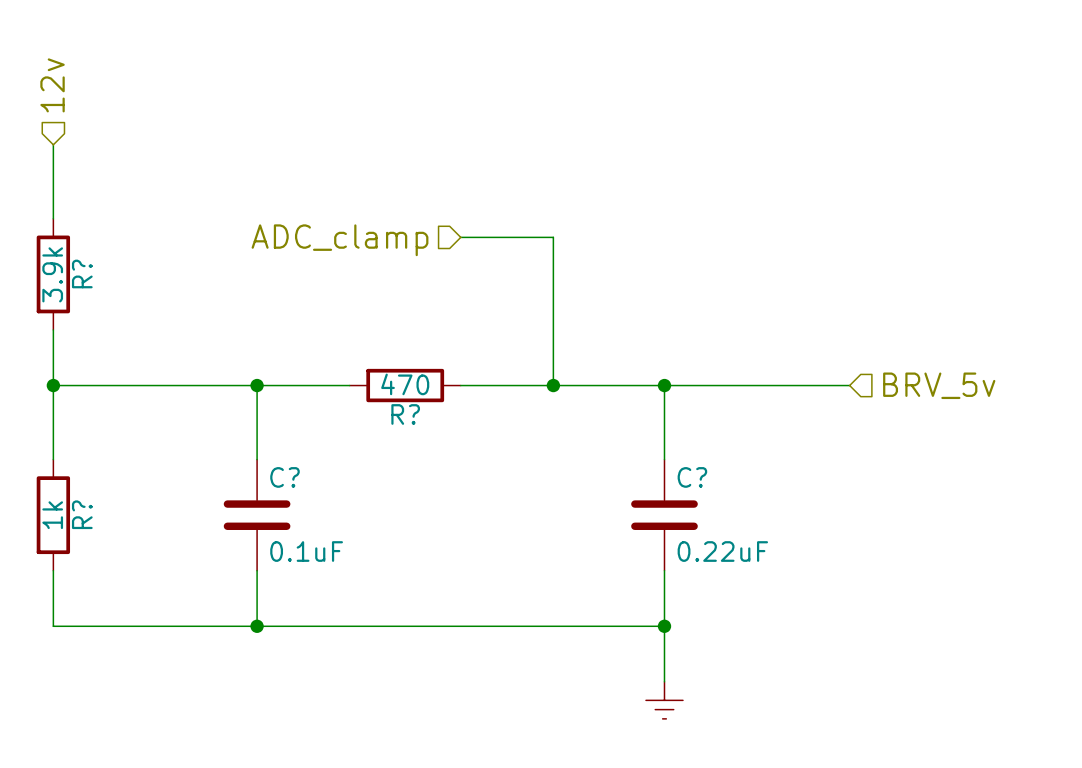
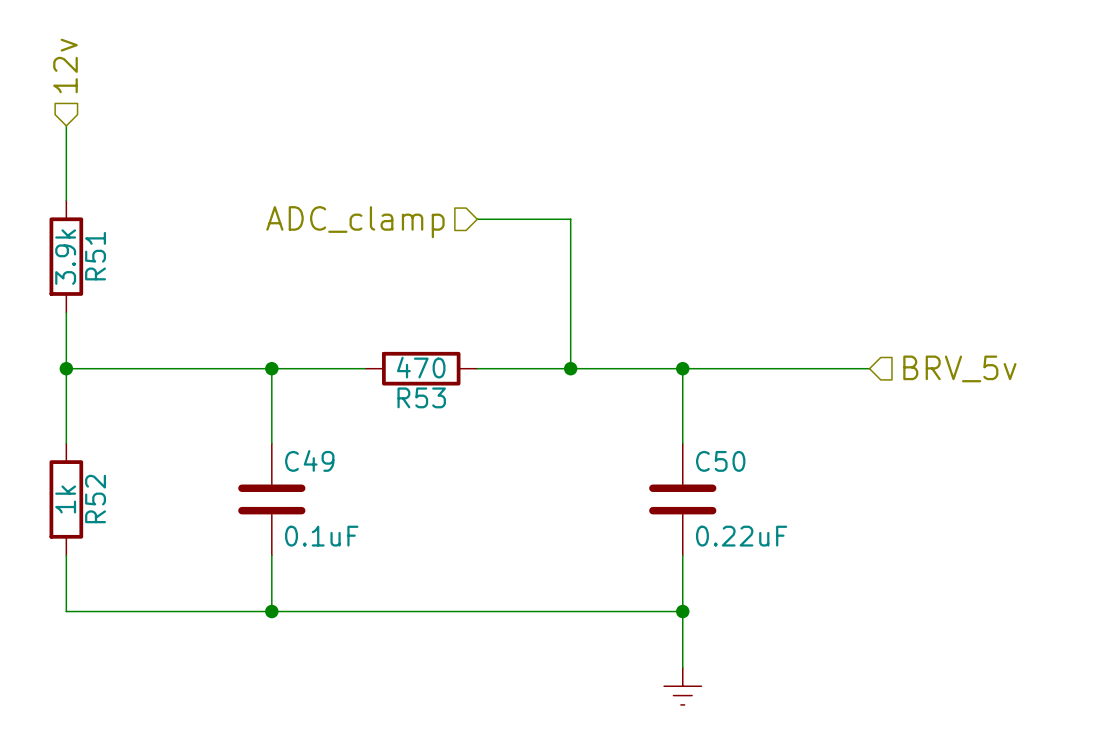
R? name: R? (82, 273) -> R51 (95, 256)
R? name: R? (405, 414) -> R53 (421, 397)
C? name: C? (284, 477) -> C49 (309, 460)
C? name: C? (692, 477) -> C50 (720, 461)
R? name: R? (82, 514) -> R52 (95, 499)

